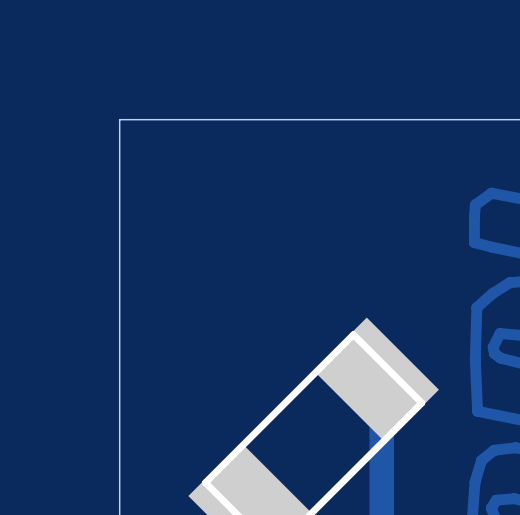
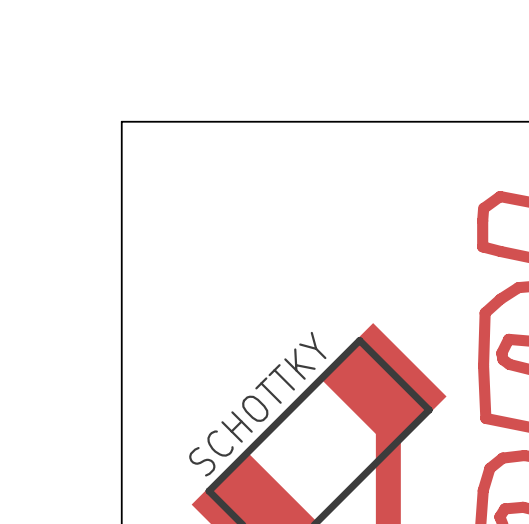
text: none -> SCHOTTKY (257, 404)

